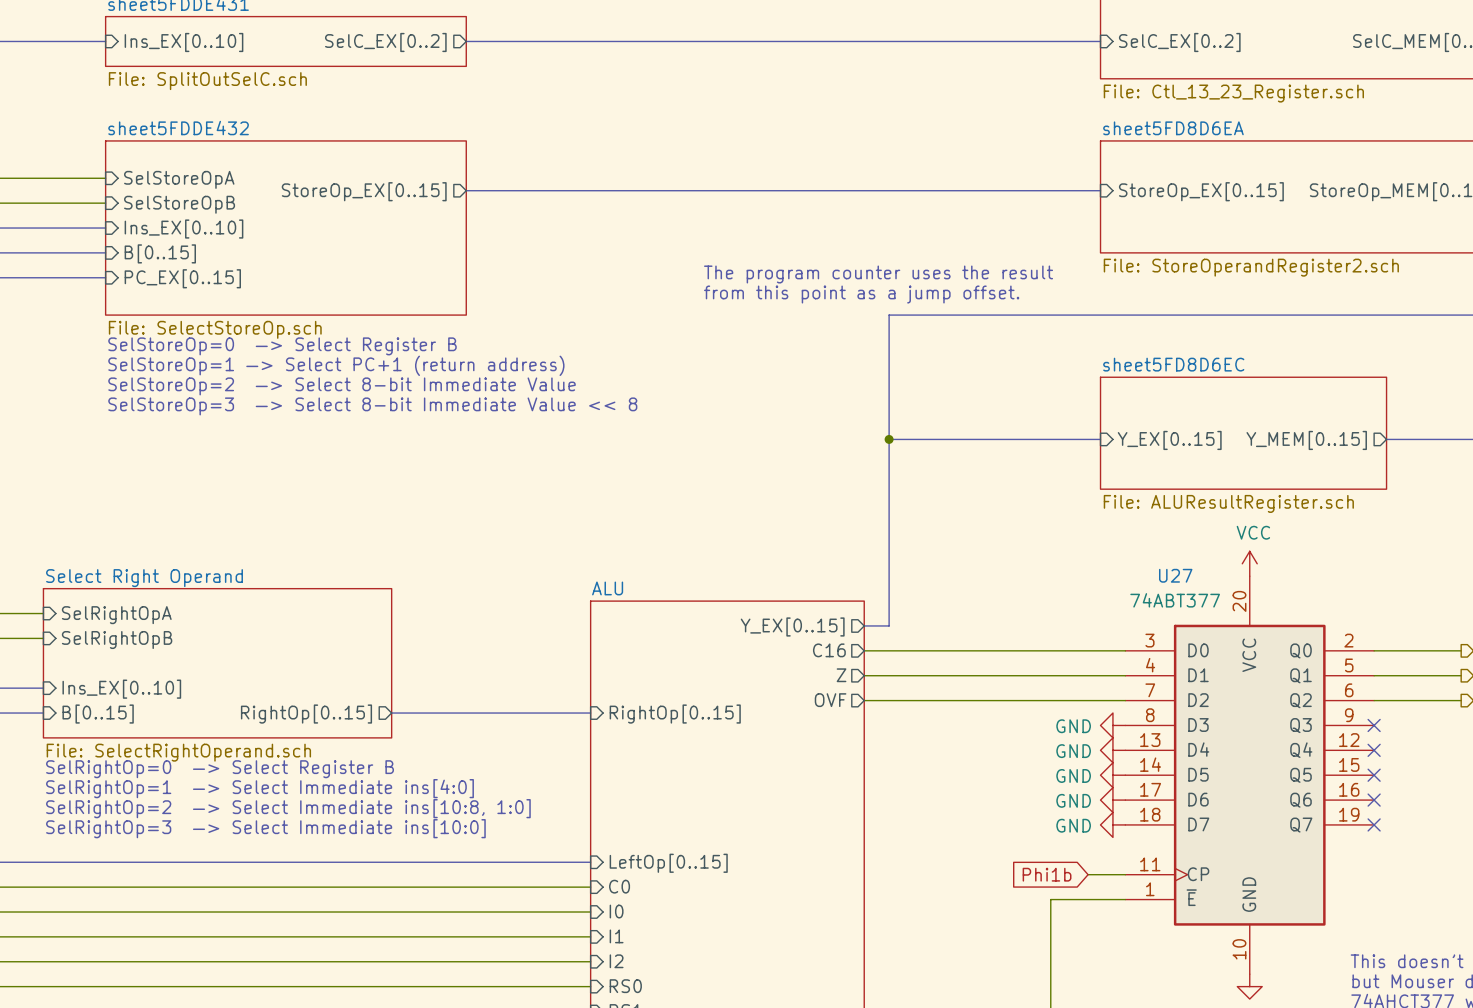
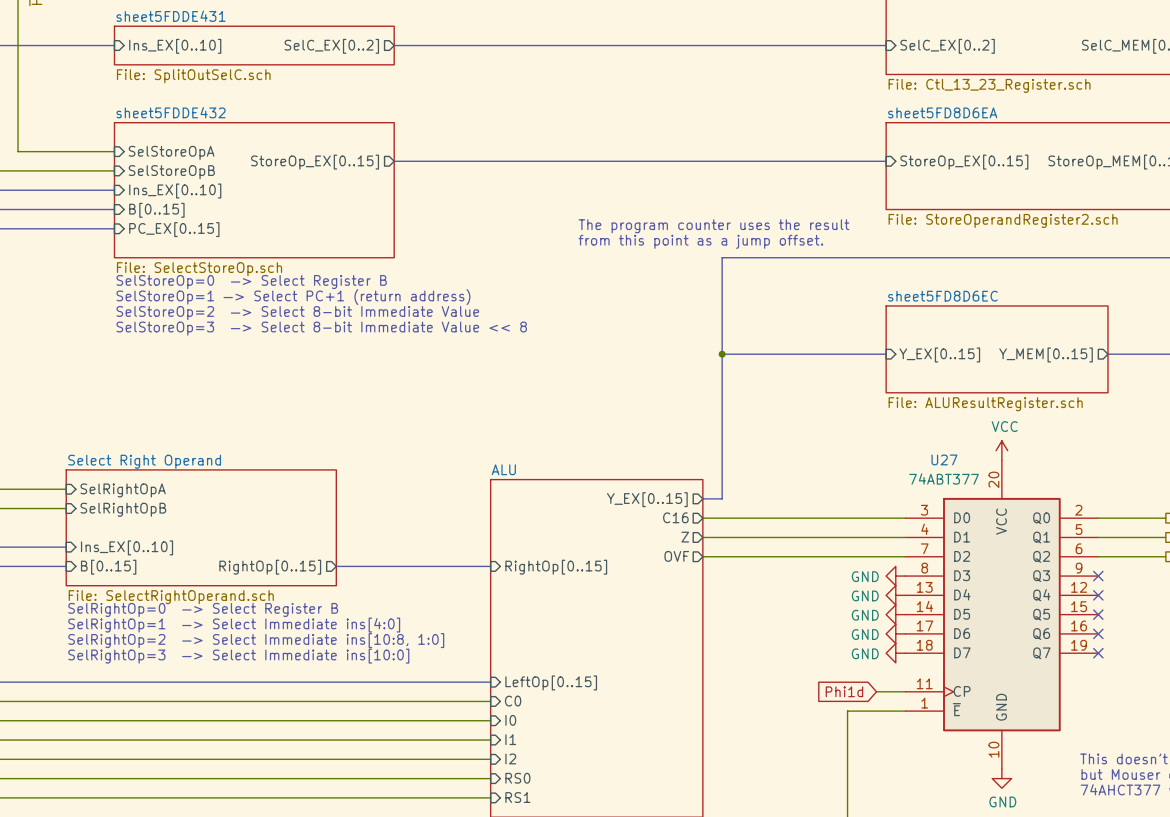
global label: Phi1b (1047, 874) -> Phi1d (844, 691)

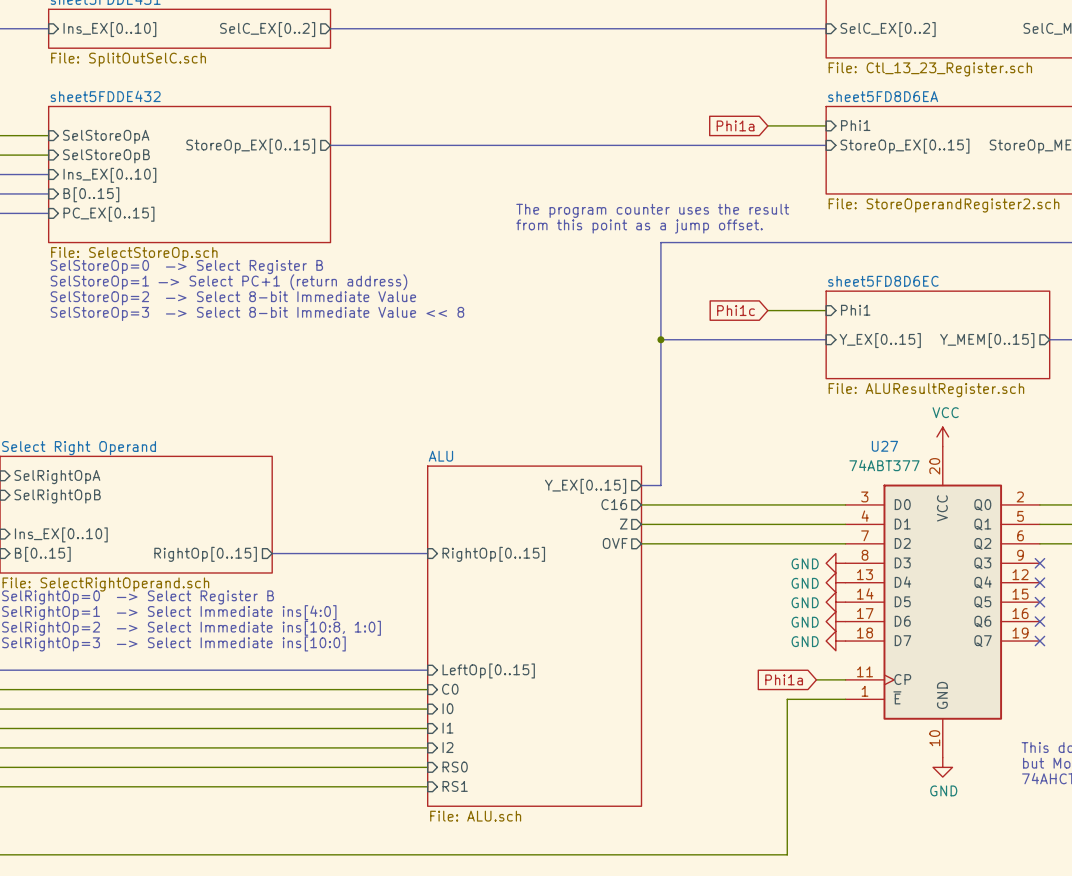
global label: none -> Phi1a (735, 125)
wire: none -> (767, 125) (826, 125)
sheet pin: none -> Phi1 (855, 125)
sheet pin: none -> Phi1 (855, 310)
global label: none -> Phi1c (736, 310)
wire: none -> (767, 310) (826, 310)
global label: Phi1d (844, 691) -> Phi1a (784, 679)

